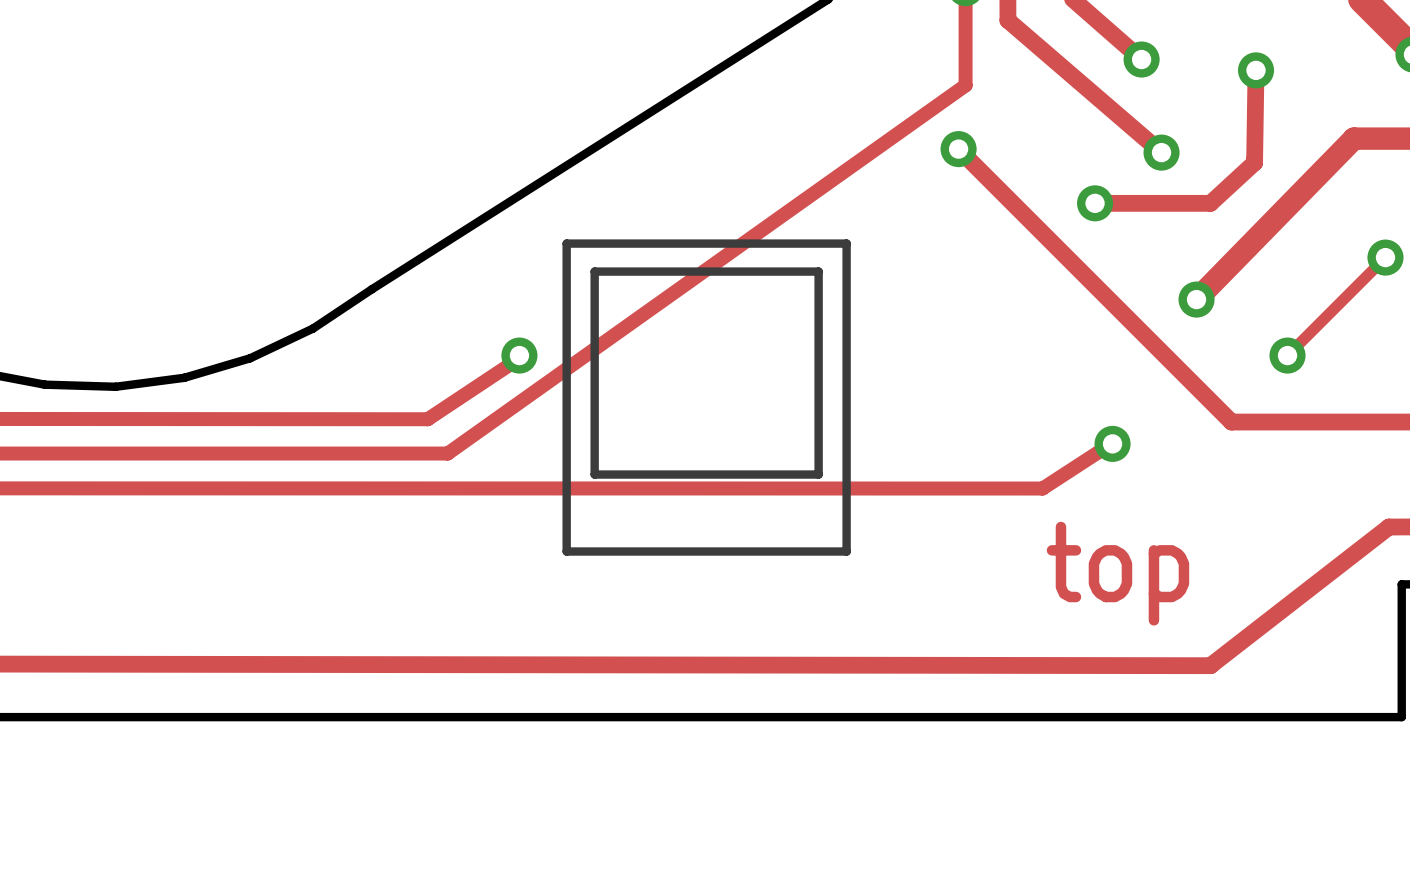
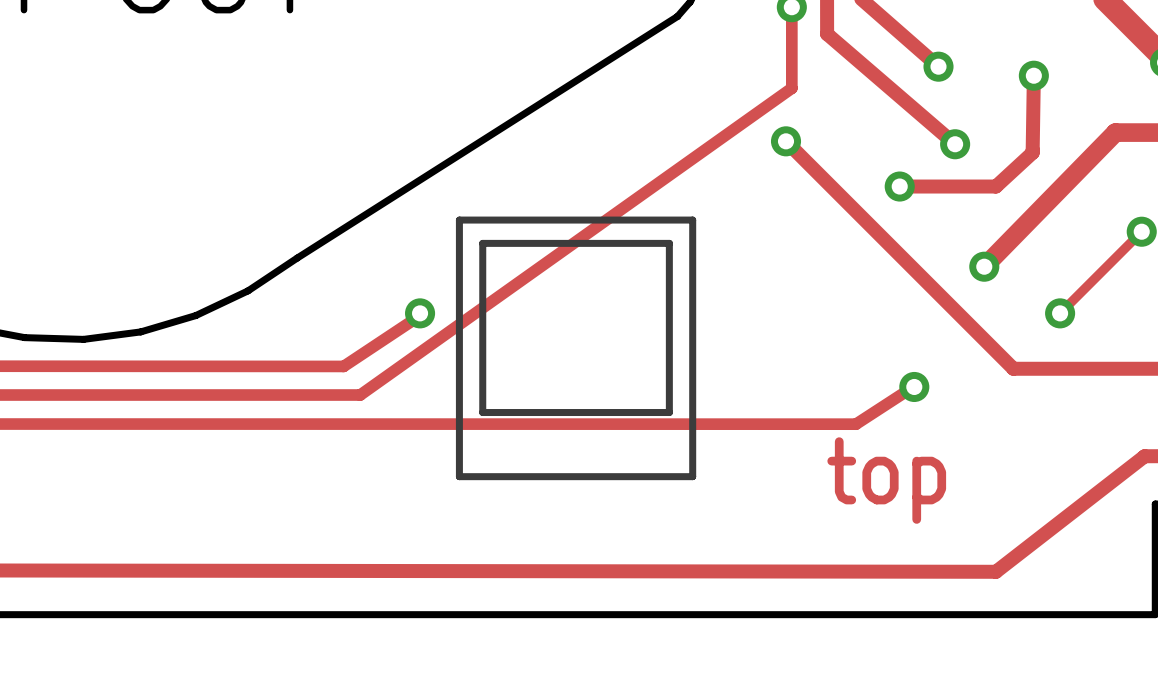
text position: top (1117, 573) -> top (886, 480)

